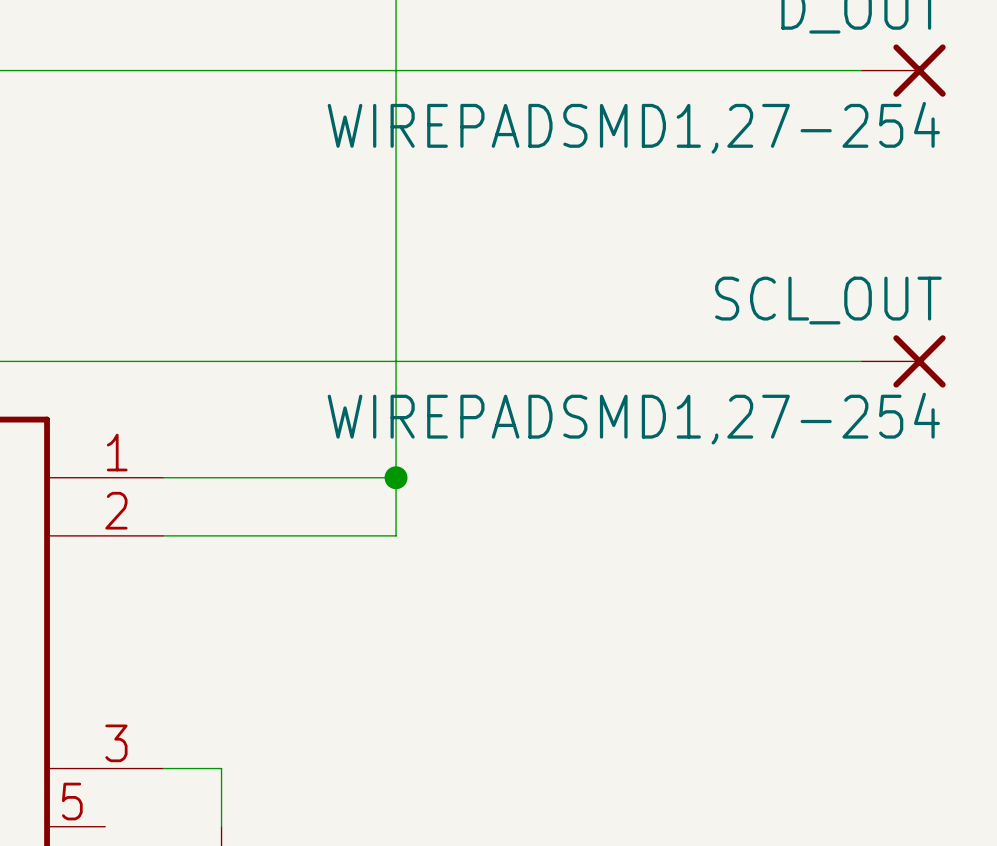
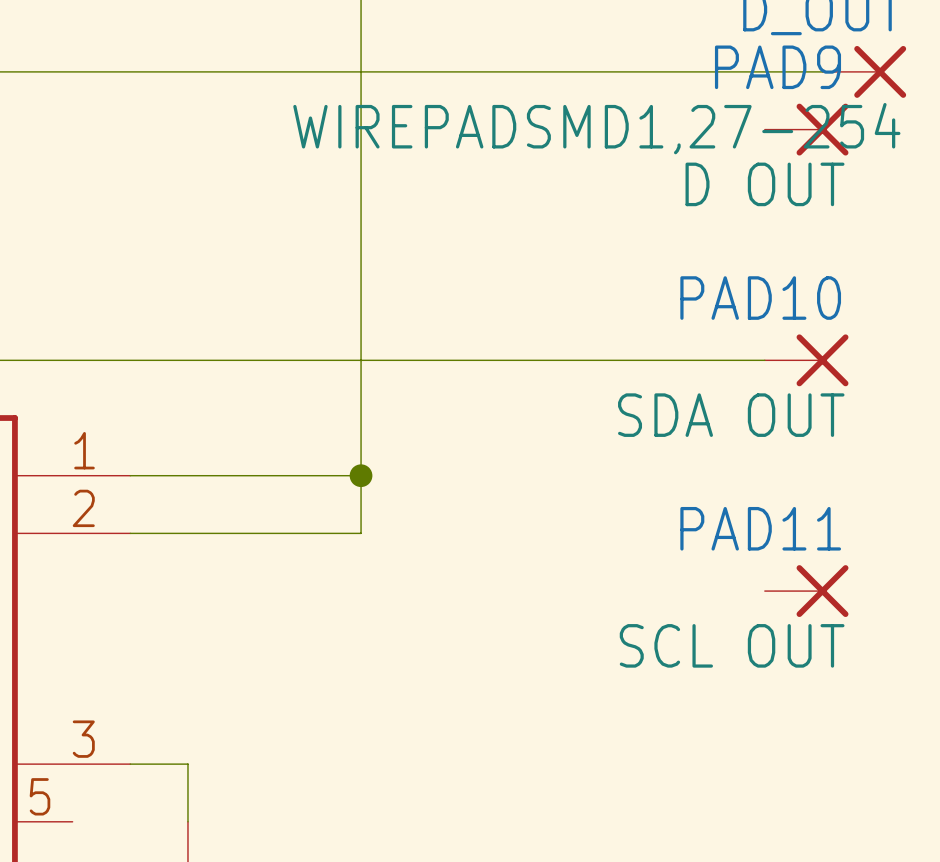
PAD9: none -> D OUT (806, 129)
PAD10: none -> SDA OUT (806, 360)
SCL_OUT: WIREPADSMD1,27-254 (903, 361) -> none
PAD11: none -> SCL OUT (806, 591)

